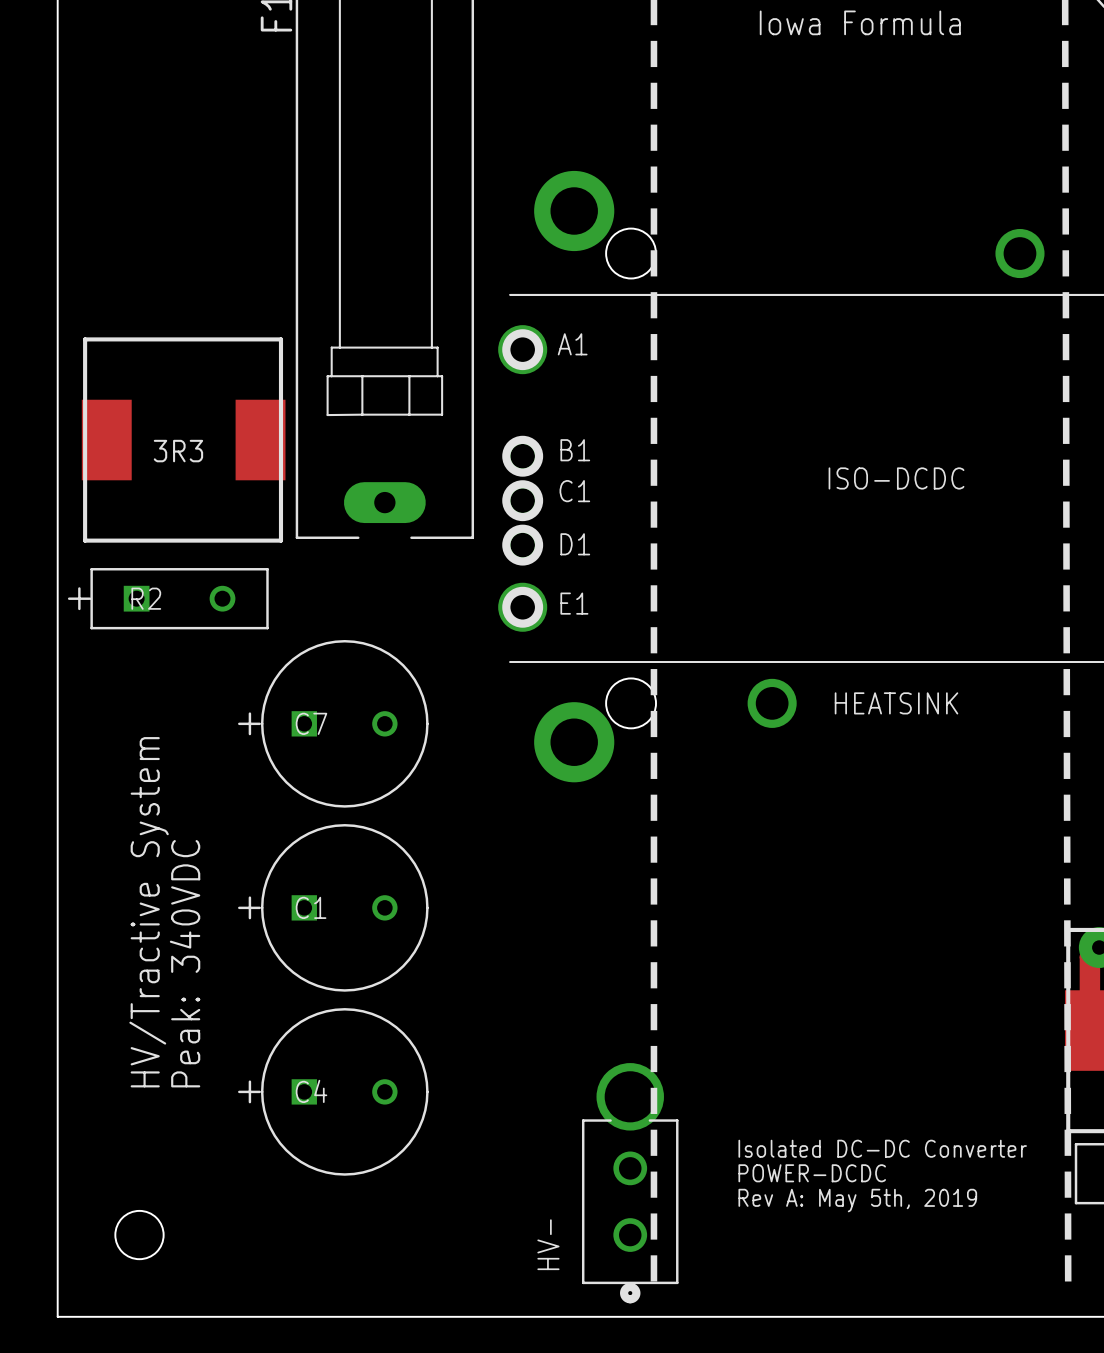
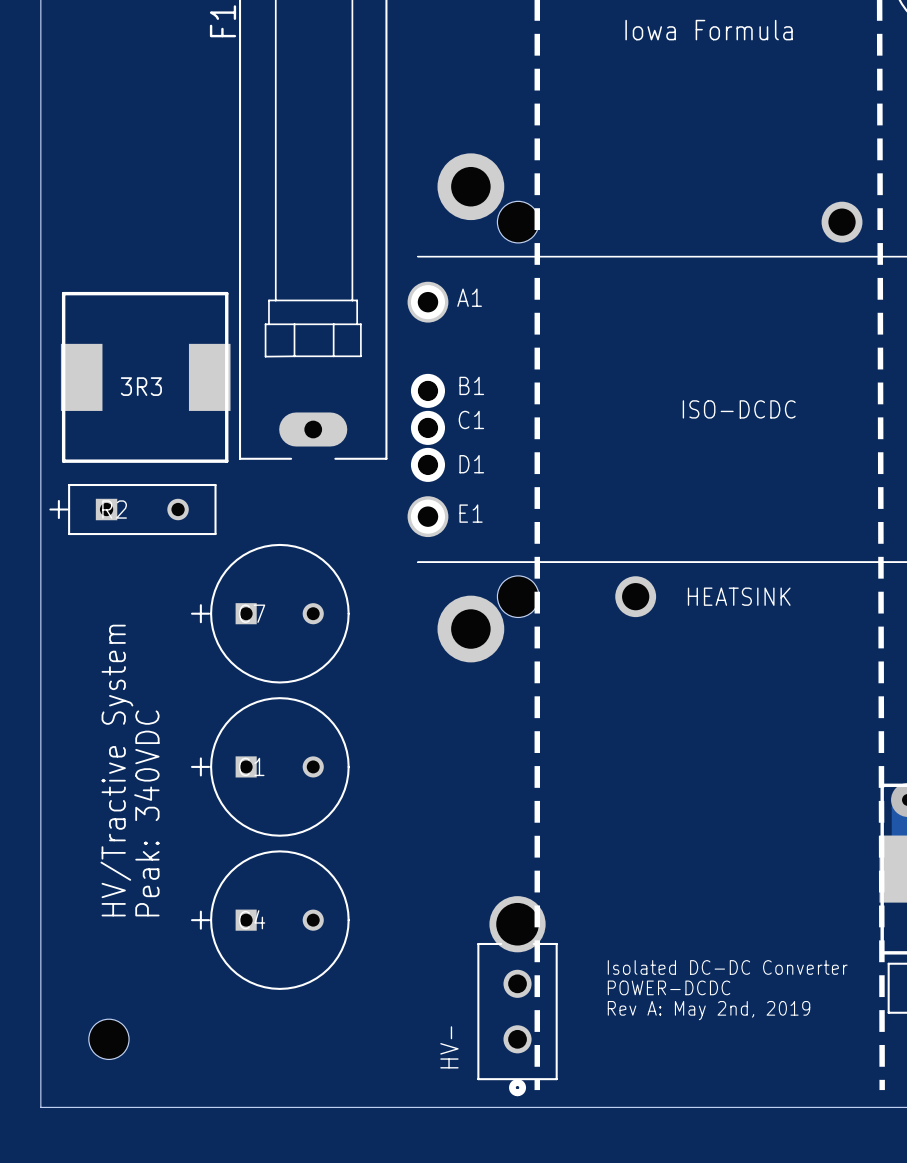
text: Rev A: May 5th, 2019 (857, 1200) -> Rev A: May 2nd, 2019 (709, 1010)

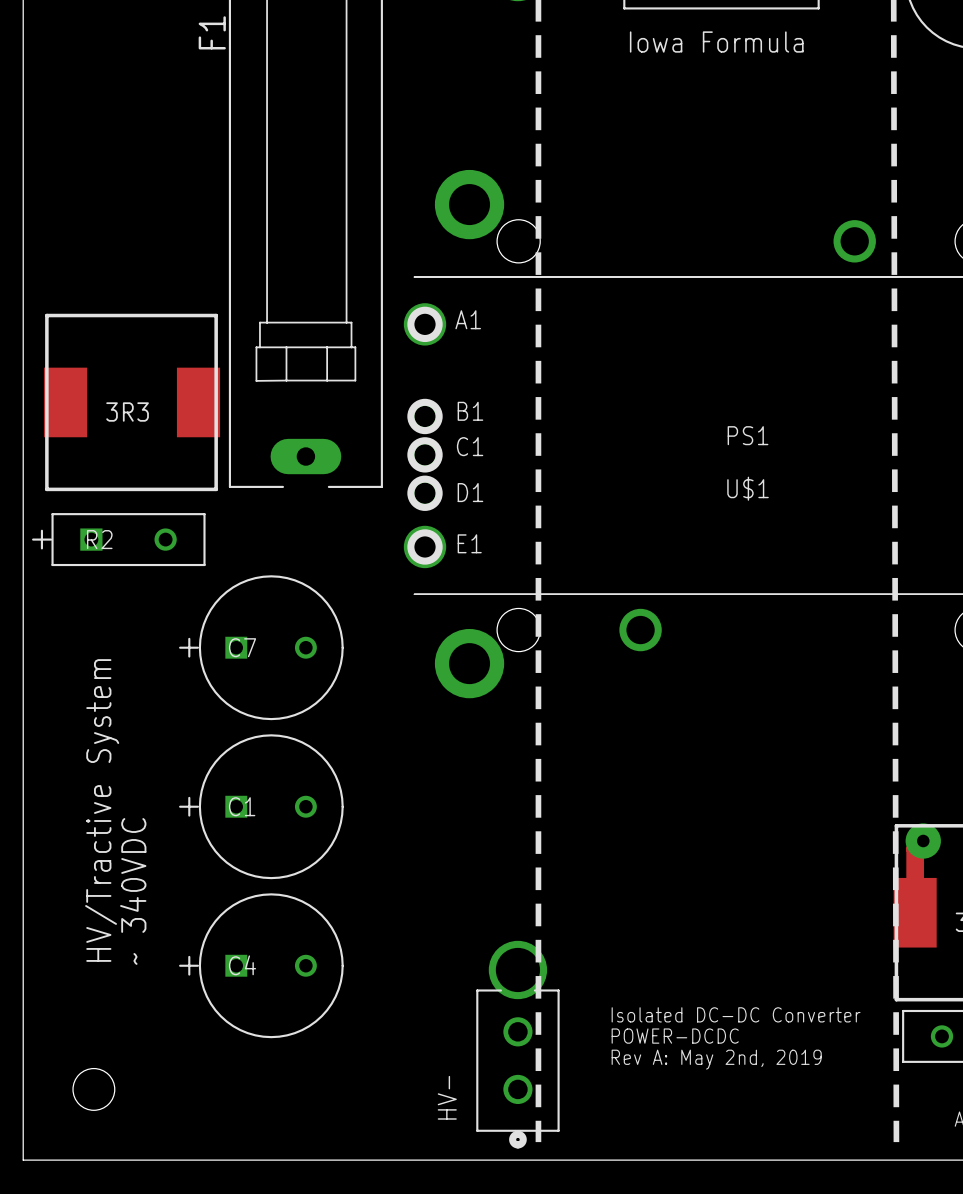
ISO-DCDC name: ISO-DCDC (739, 409) -> PS1 (748, 435)
HEATSINK name: HEATSINK (739, 596) -> U$1 (748, 488)
text: Peak: 340VDC (146, 813) -> ~ 340VDC (133, 891)

